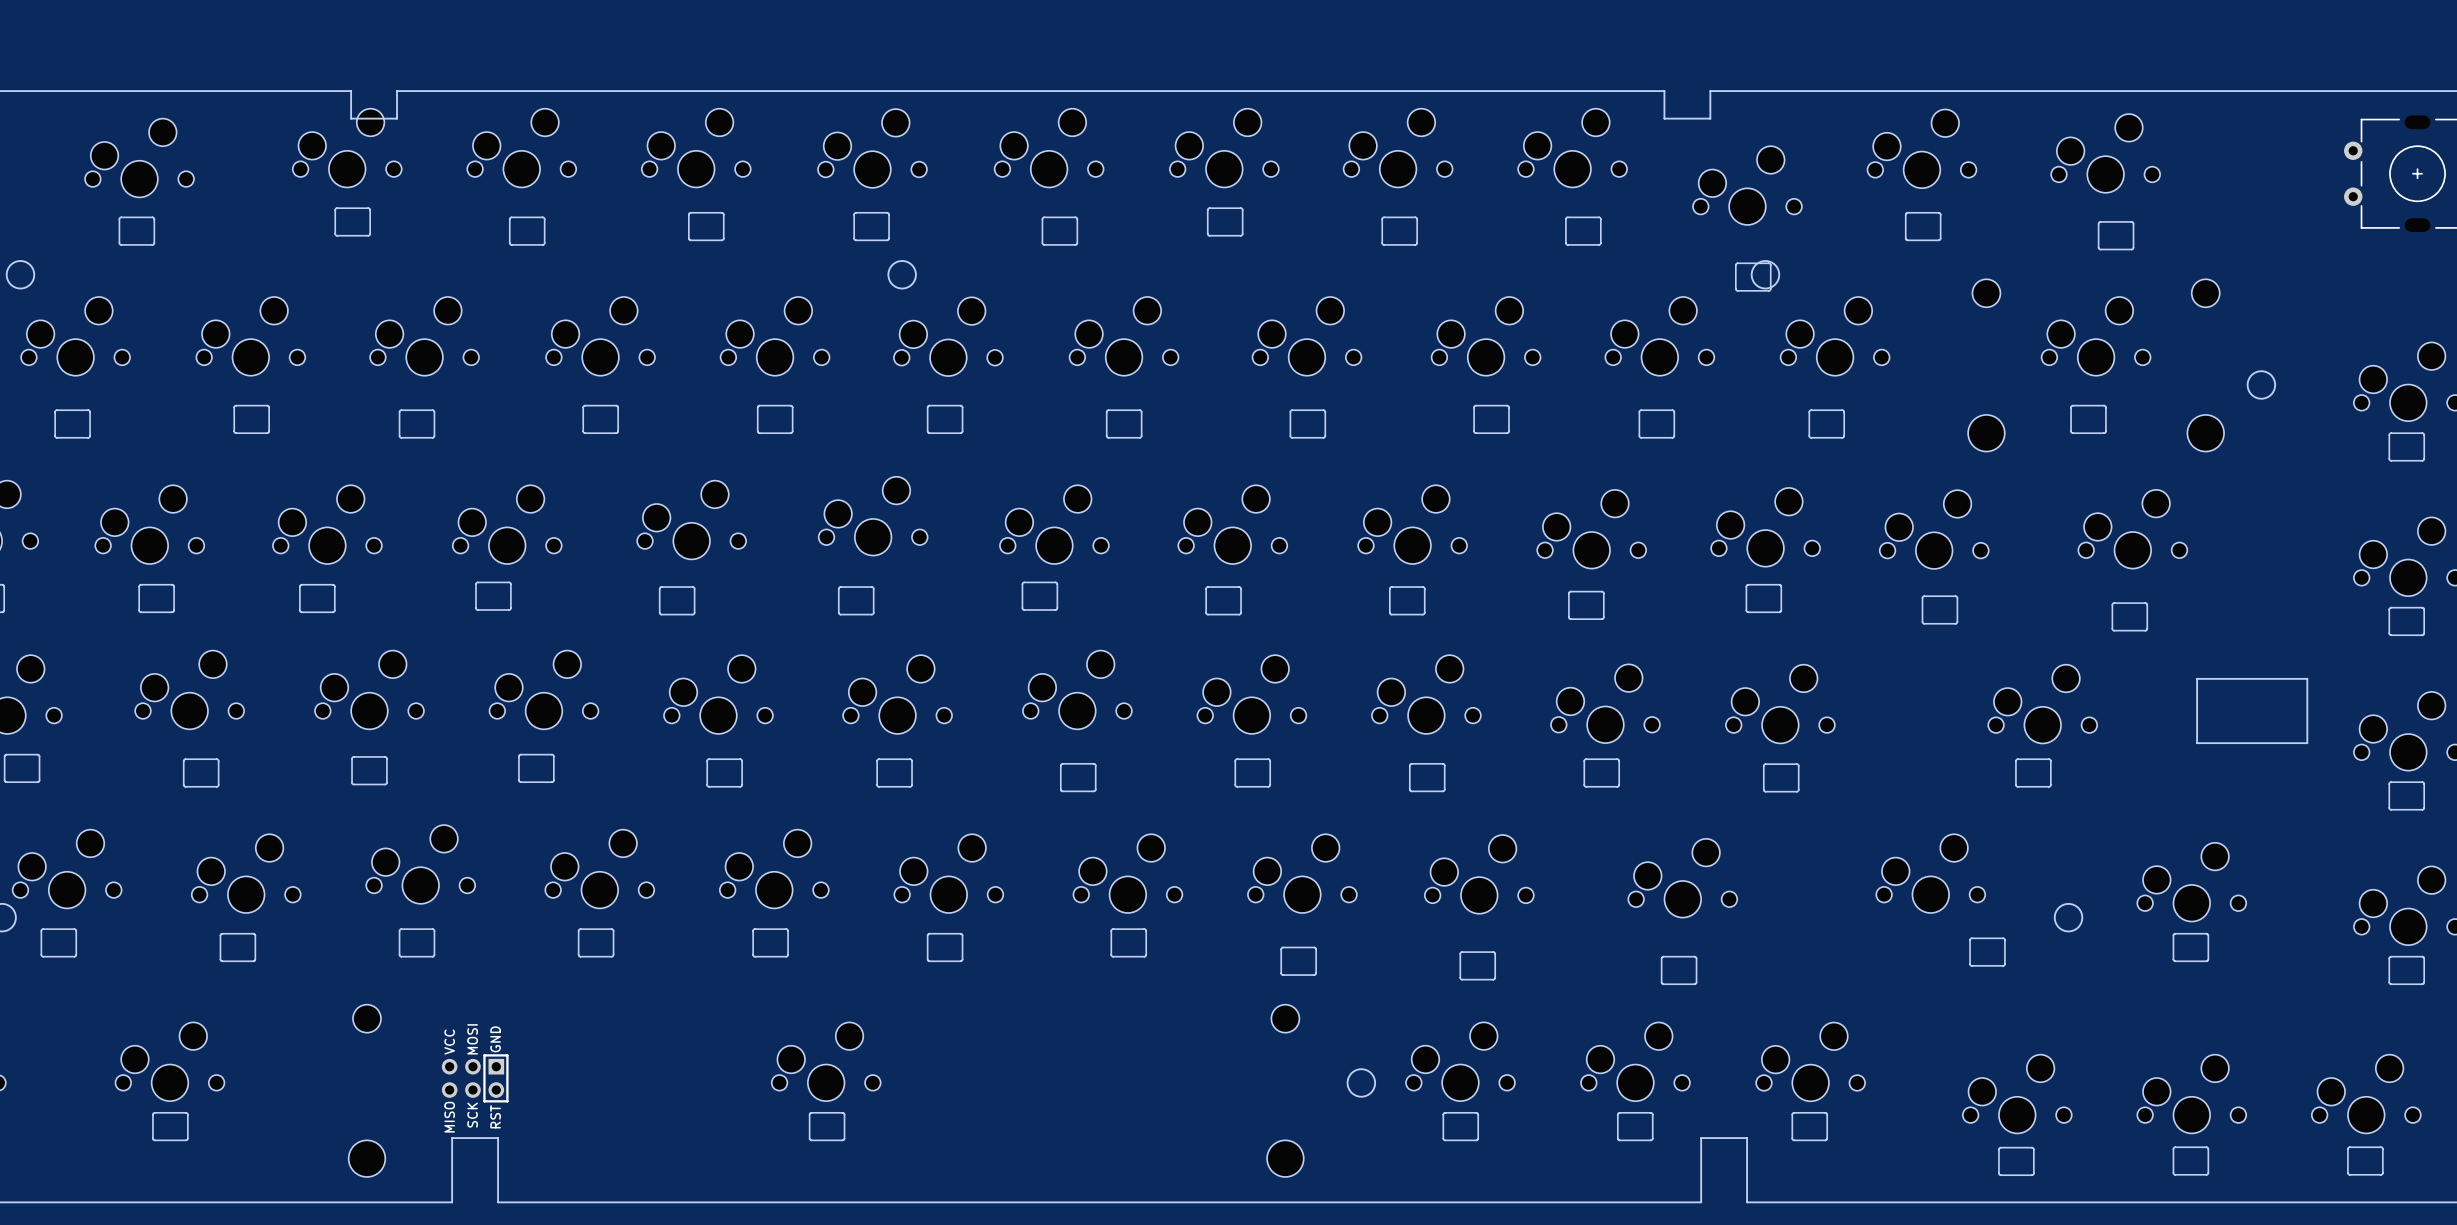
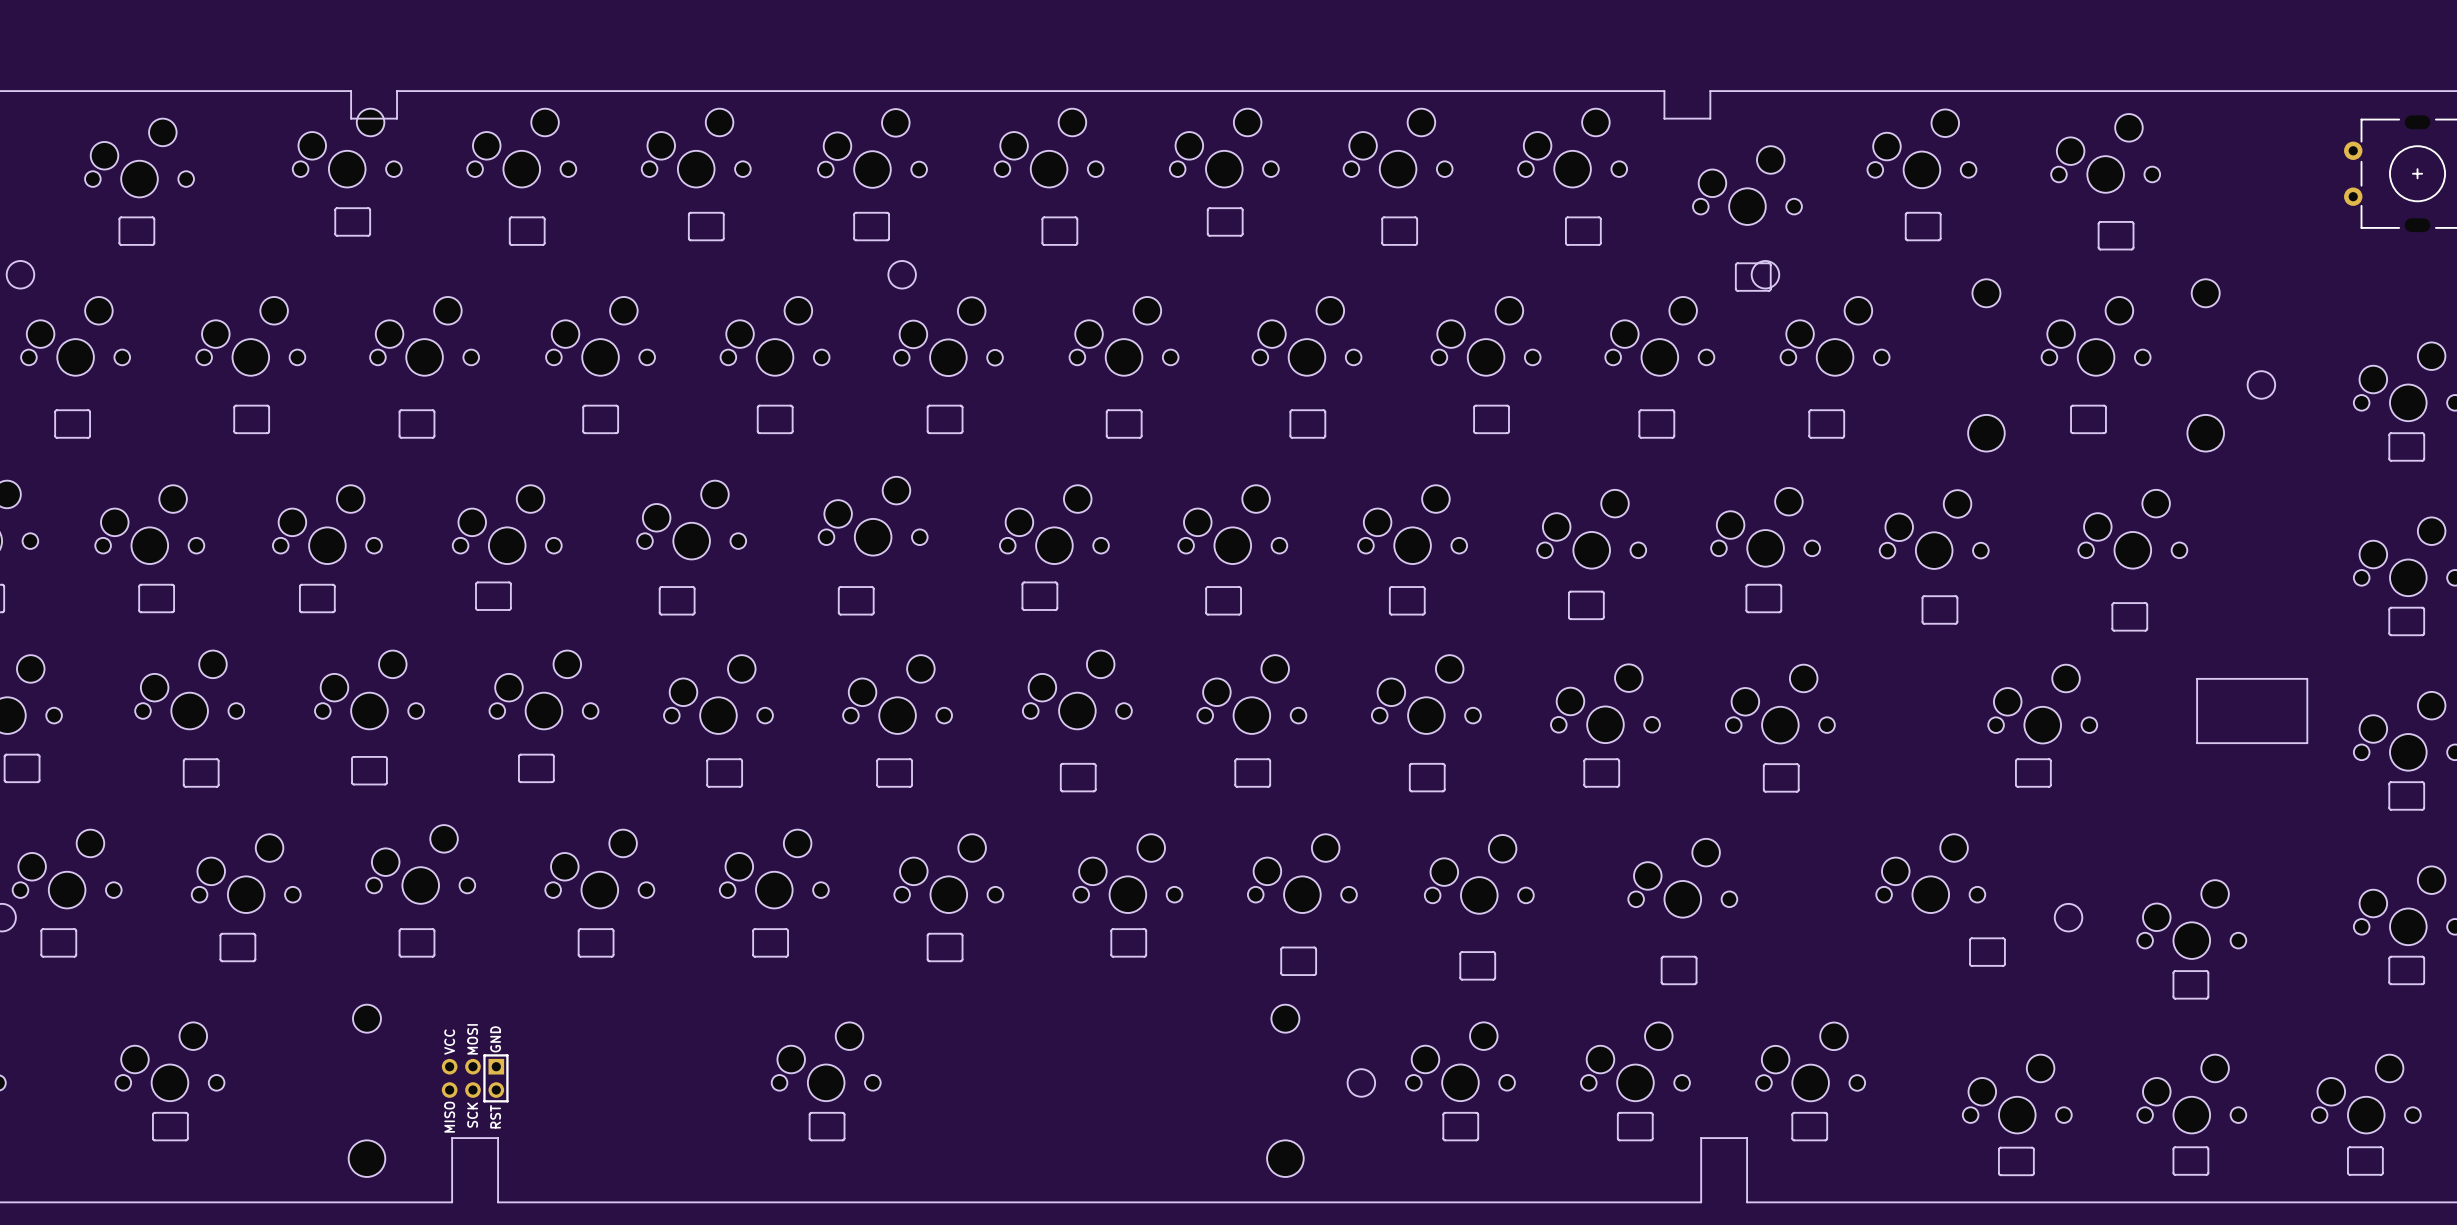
part position: (2191, 882) -> (2191, 919)
part position: (2190, 947) -> (2190, 984)

